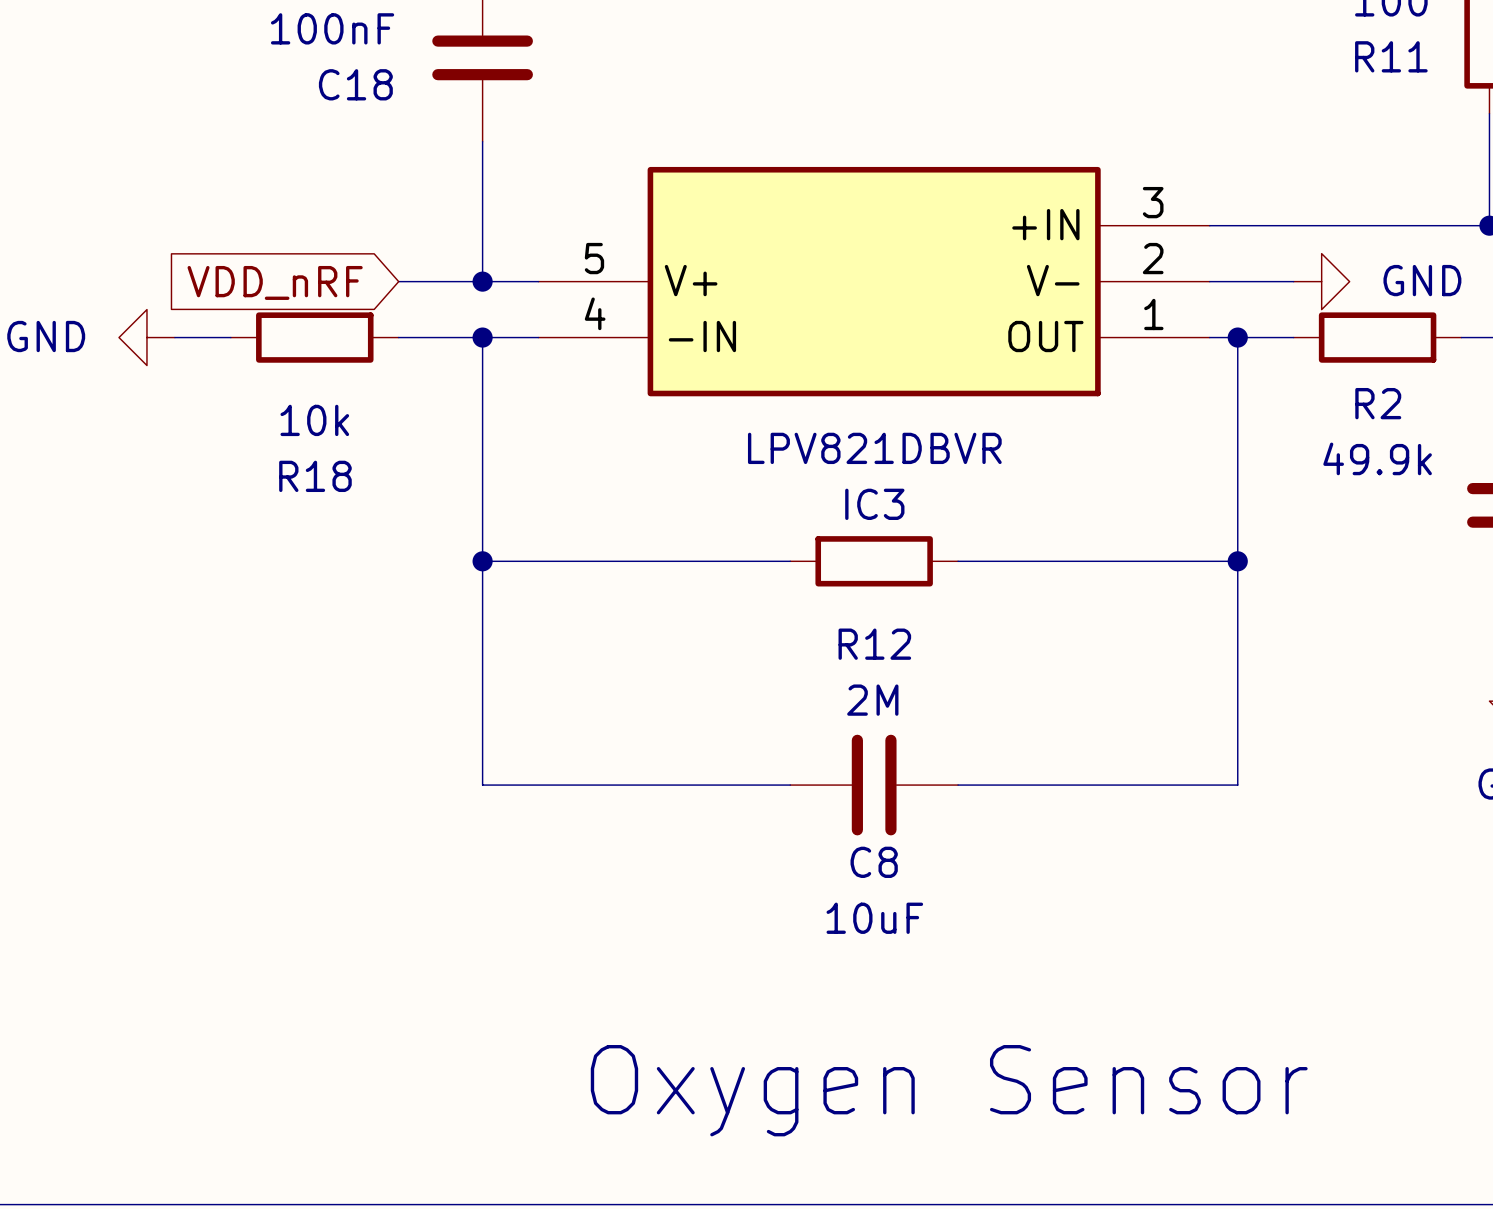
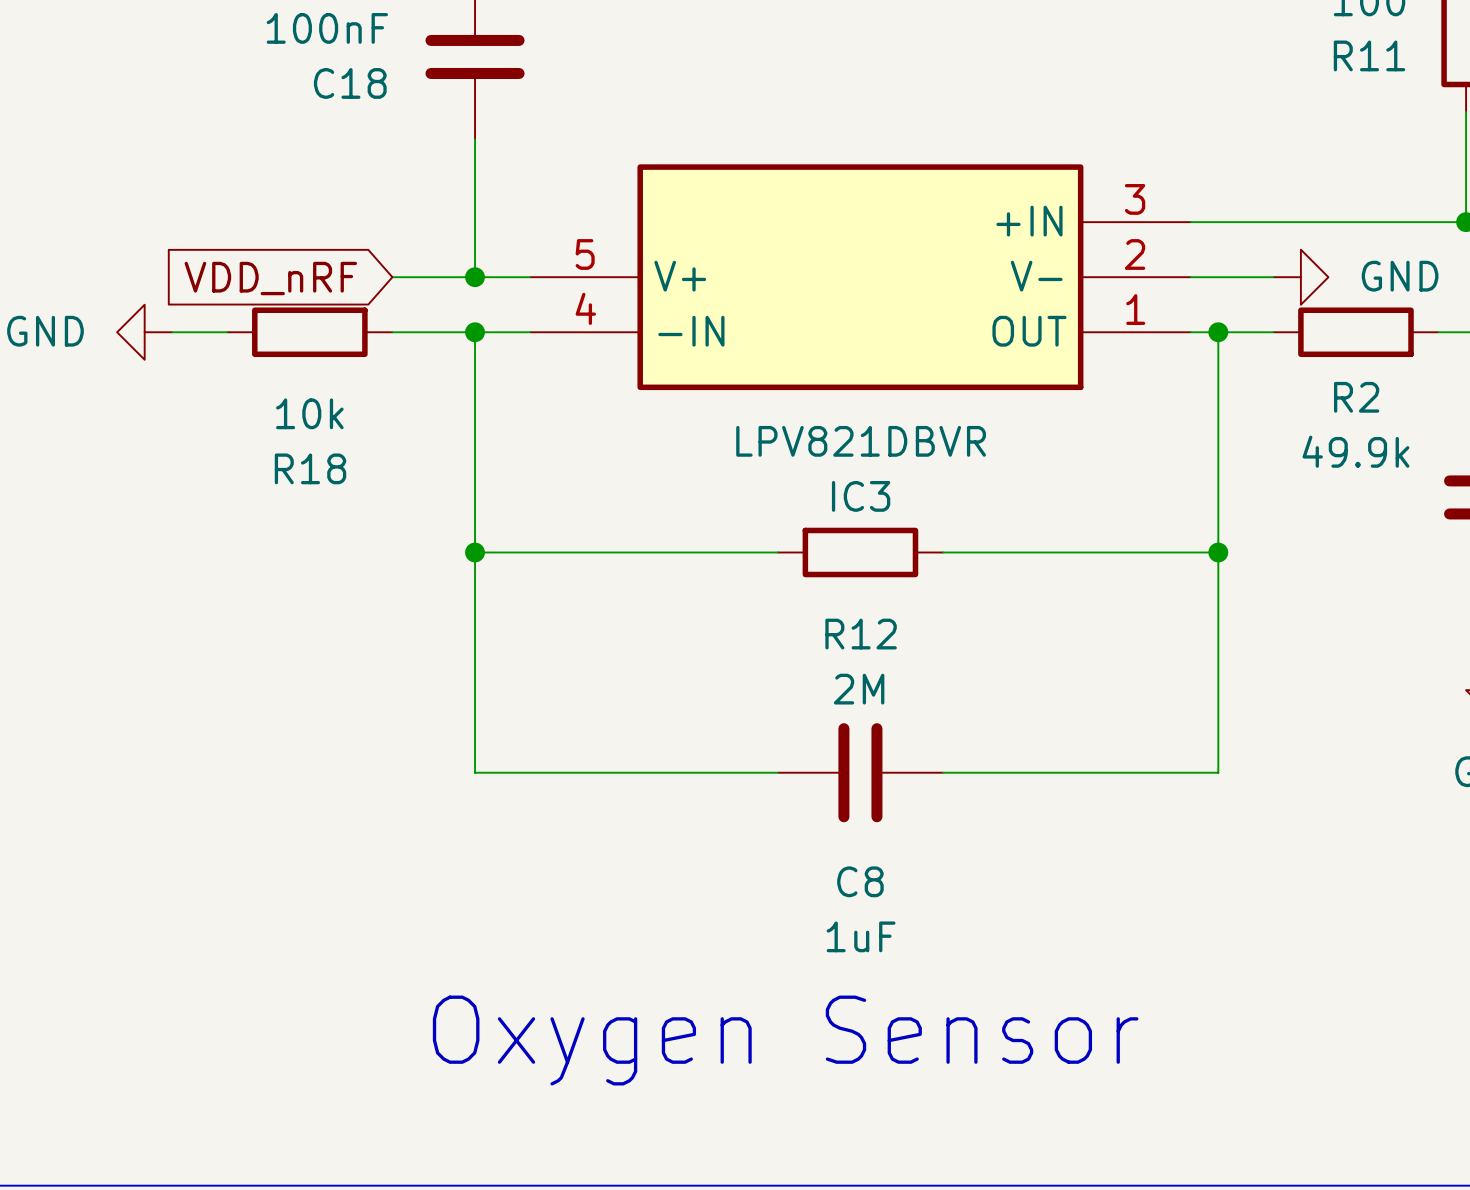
C8 name position: C8 (874, 862) -> C8 (860, 881)
C8 value: 10uF (874, 918) -> 1uF (861, 936)
text position: Oxygen Sensor (949, 1090) -> Oxygen Sensor (785, 1040)

